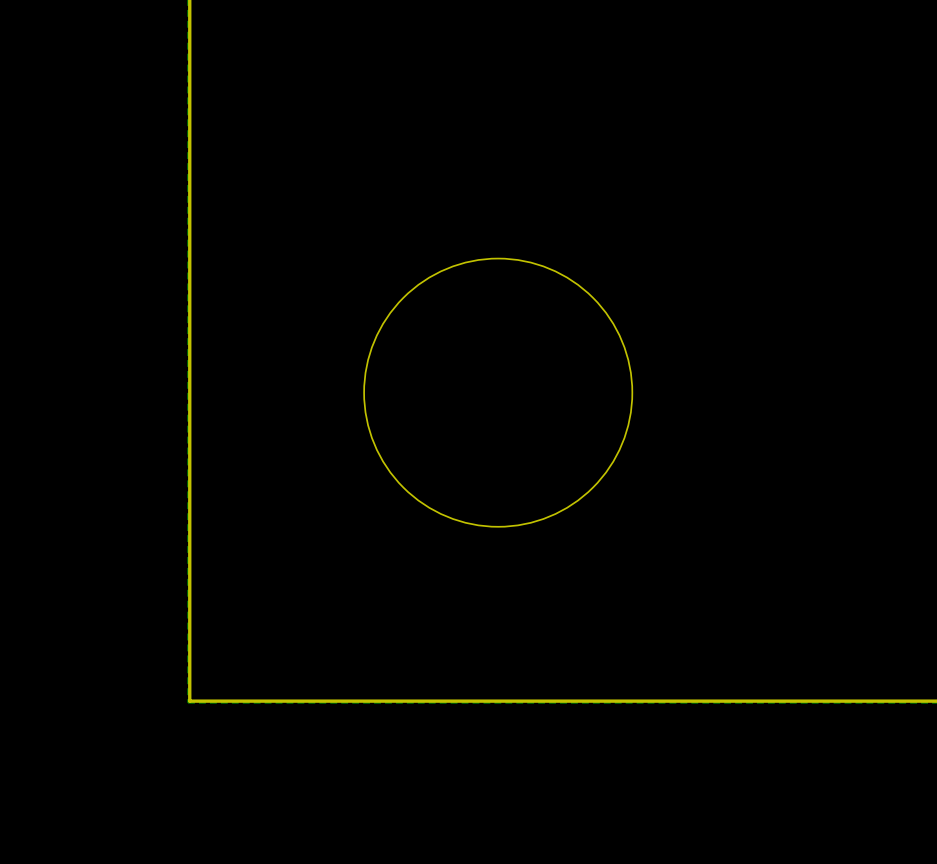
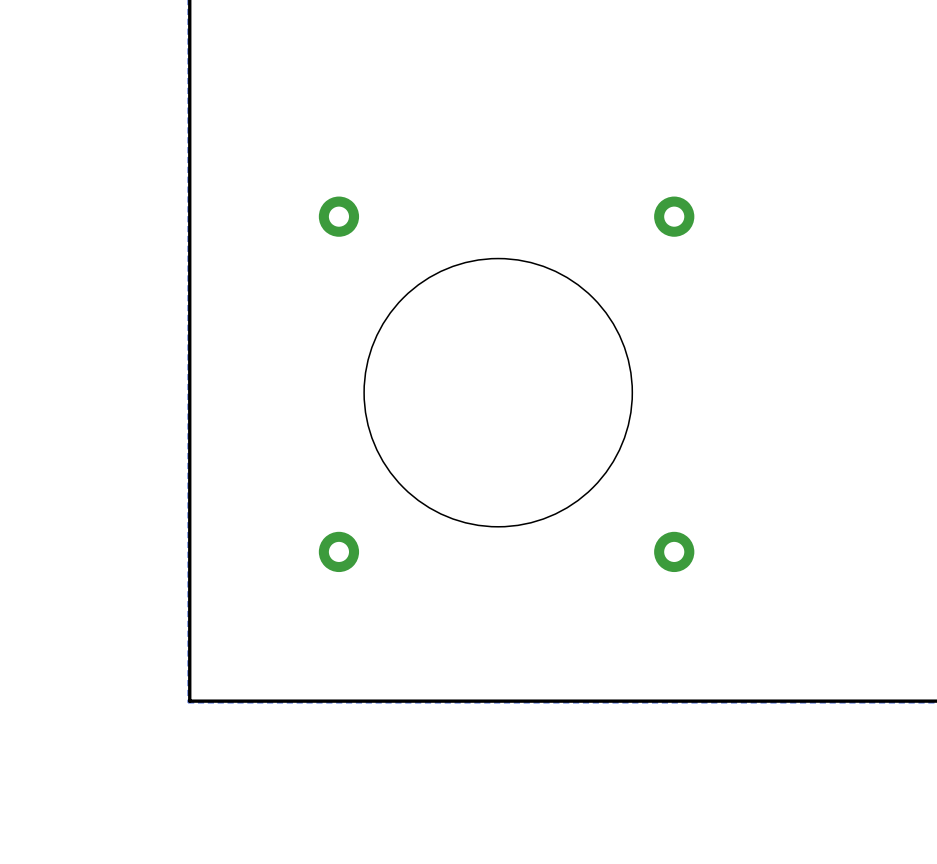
via: none -> (338, 216)
via: none -> (674, 216)
via: none -> (338, 551)
via: none -> (674, 551)

